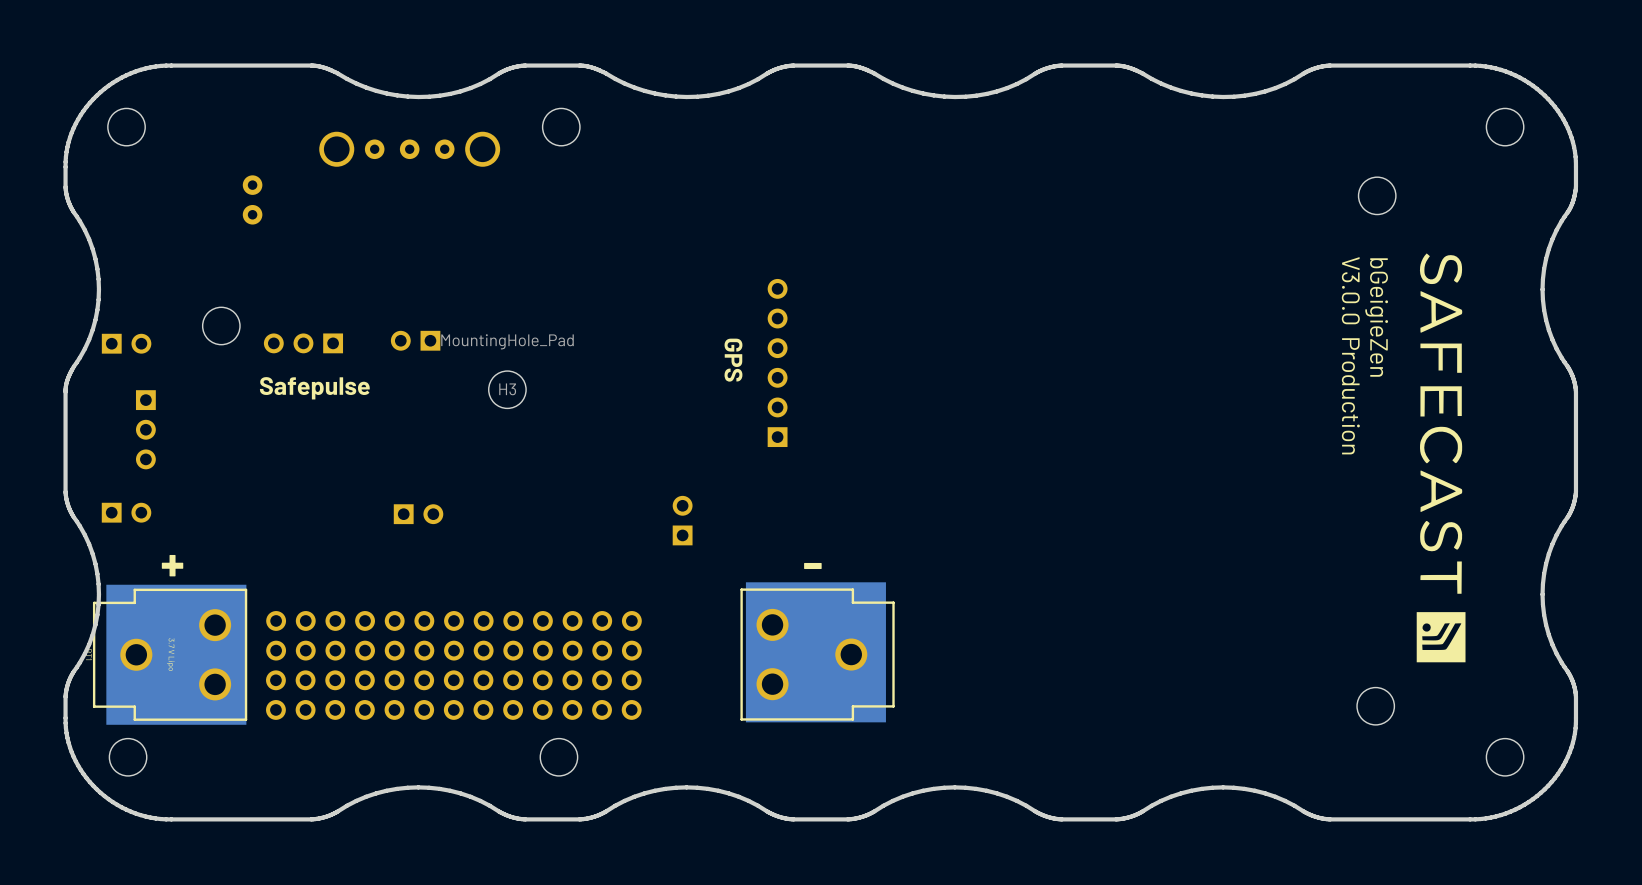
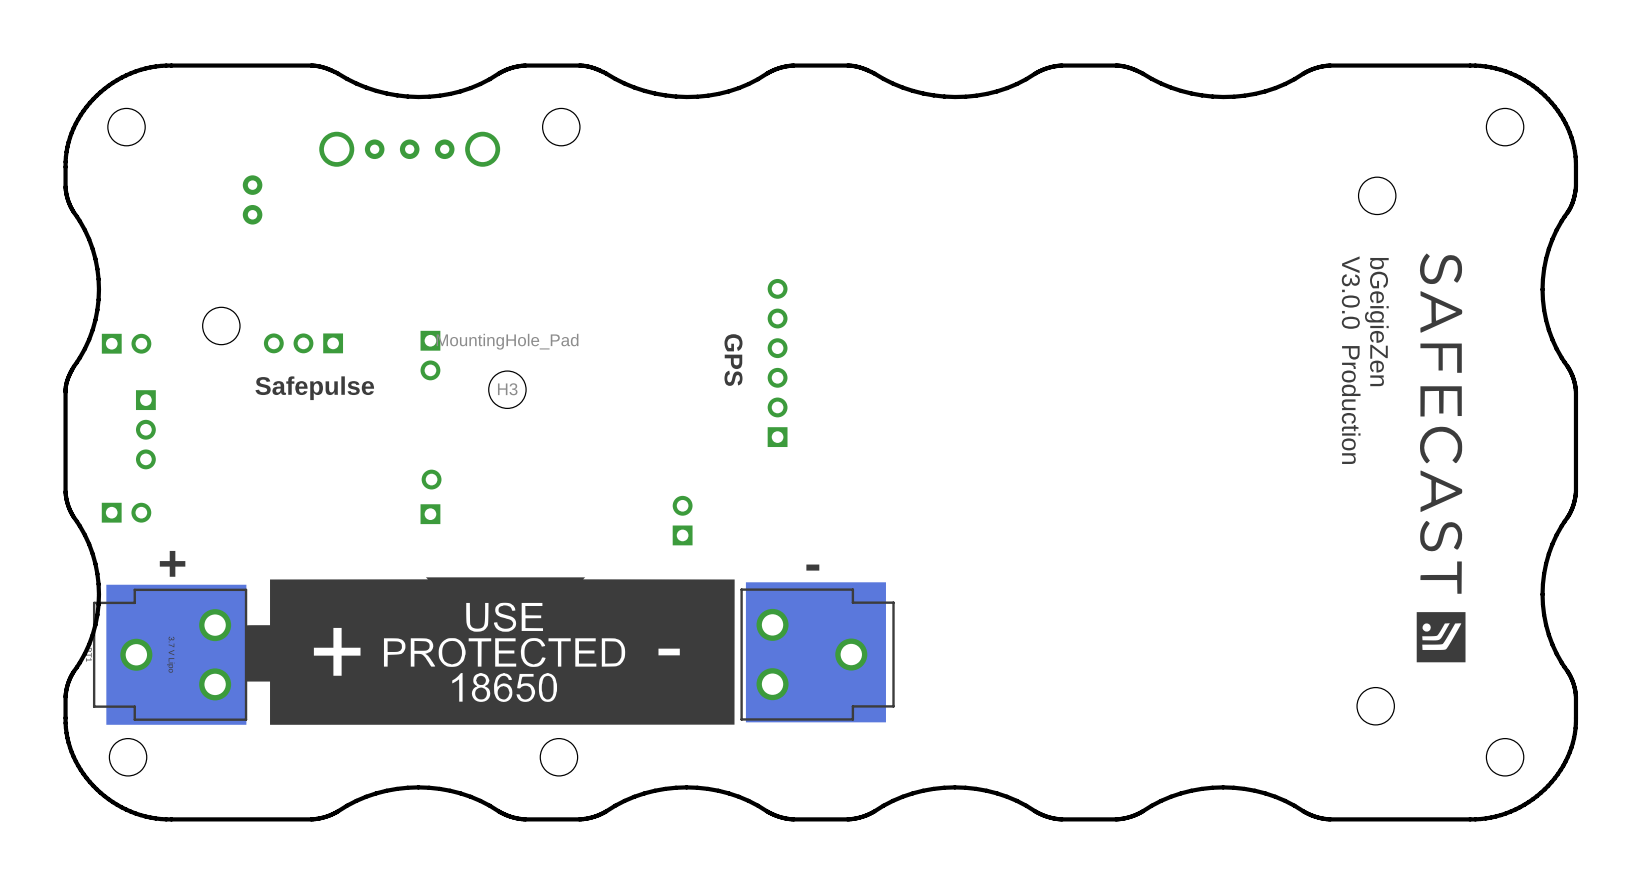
part rotation: 0° (415, 340) -> 90° counterclockwise (430, 355)
part: none -> (431, 496)
part: (418, 514) -> none
drawing: none -> [245, 577, 735, 725]
part: (453, 635) -> none
part: (453, 695) -> none

